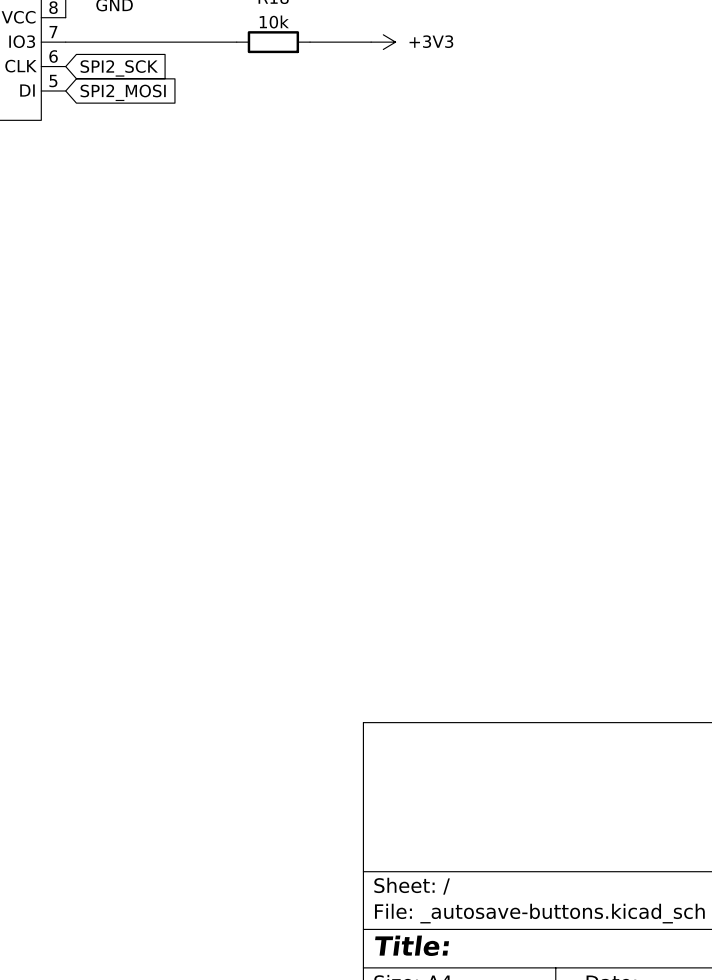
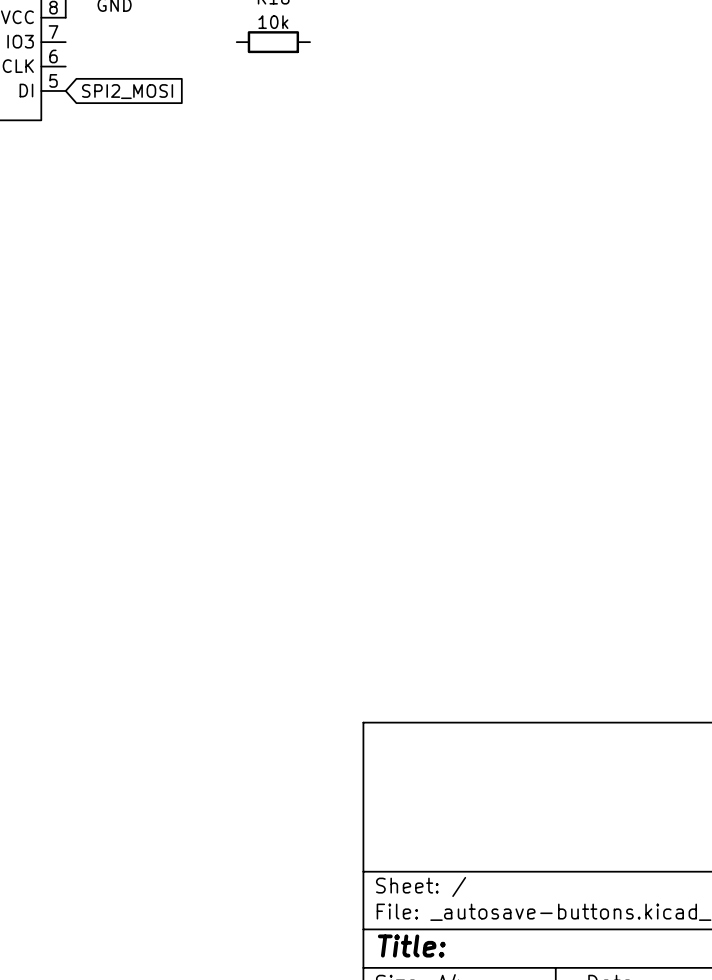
wire: (65, 42) (236, 42) -> none
wire: (310, 42) (371, 42) -> none
power symbol: +3V3 (383, 42) -> none
global label: SPI2_SCK (119, 68) -> none

